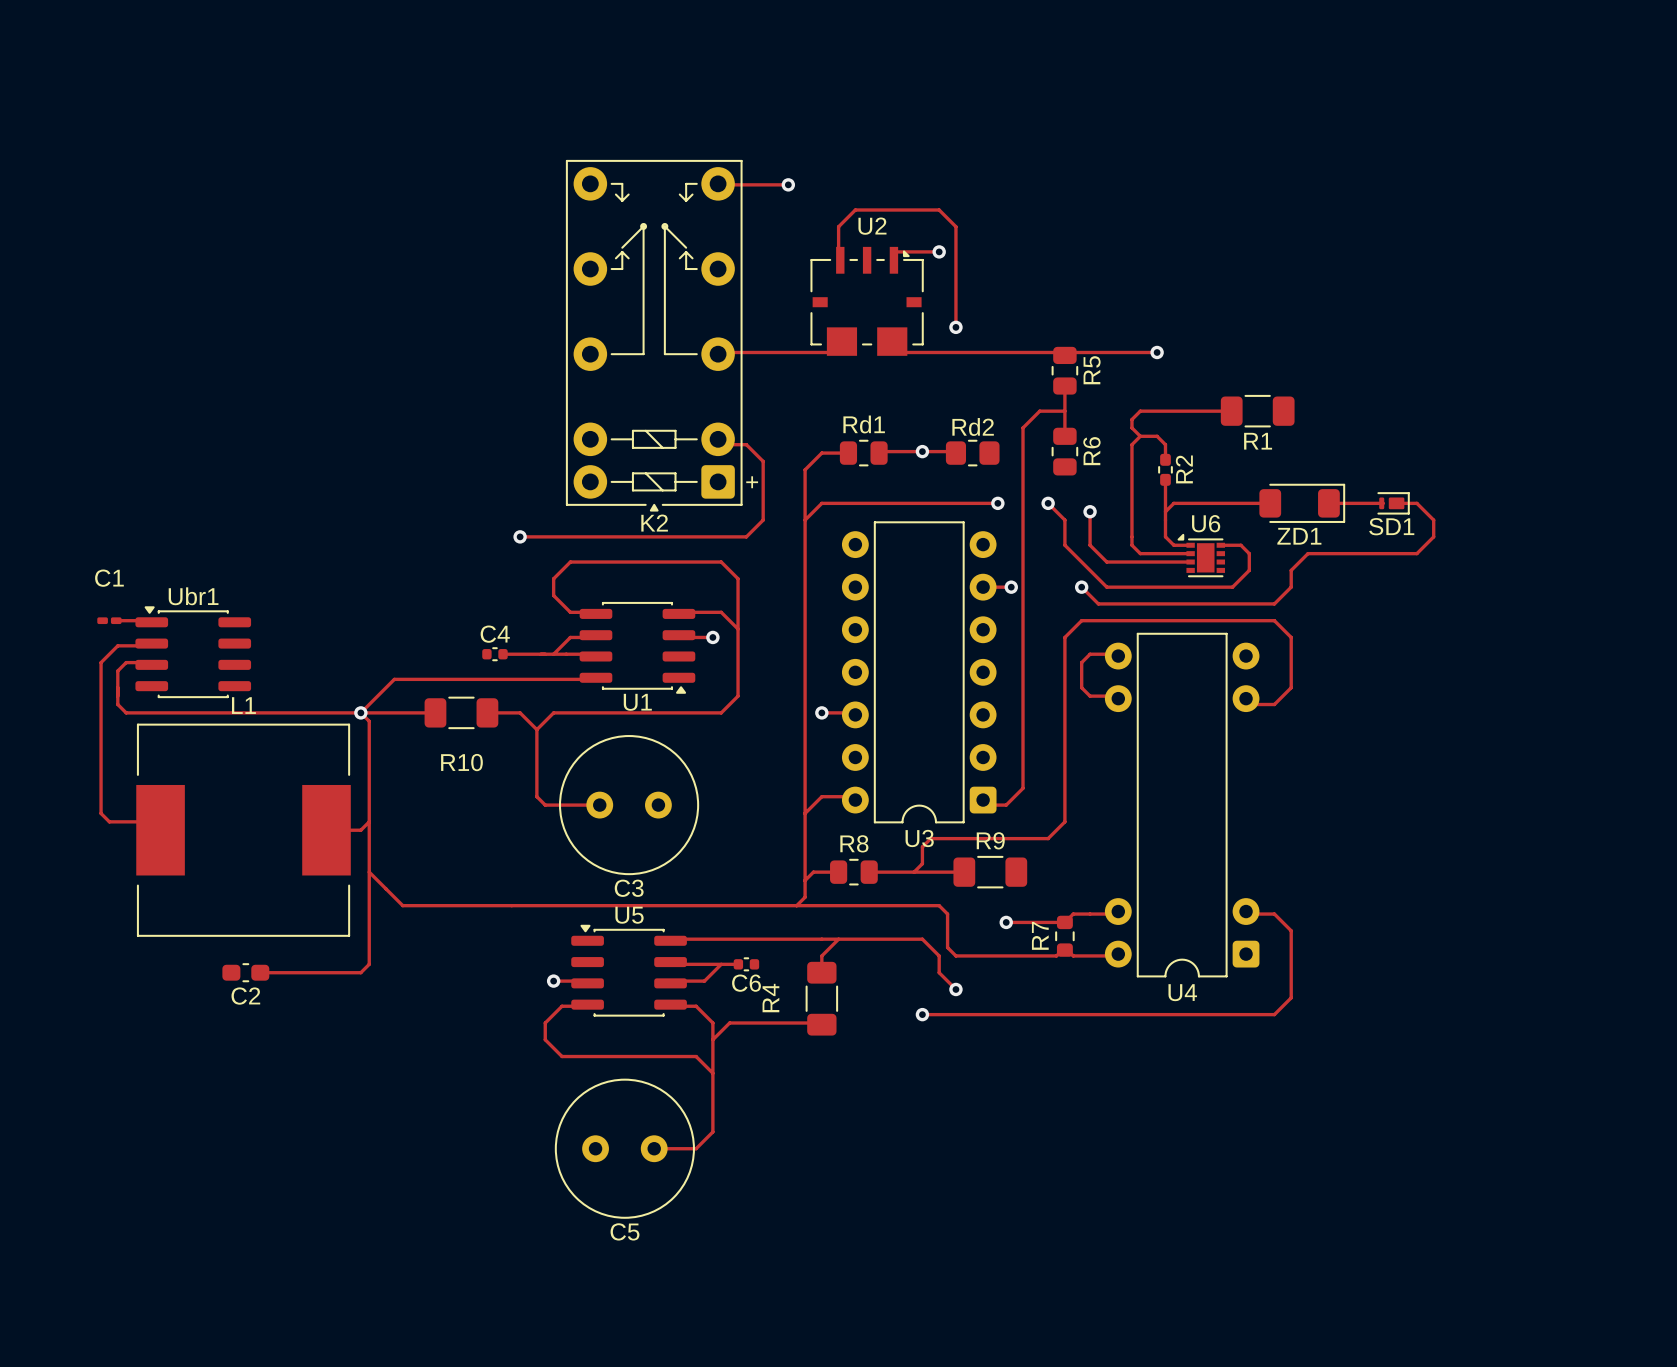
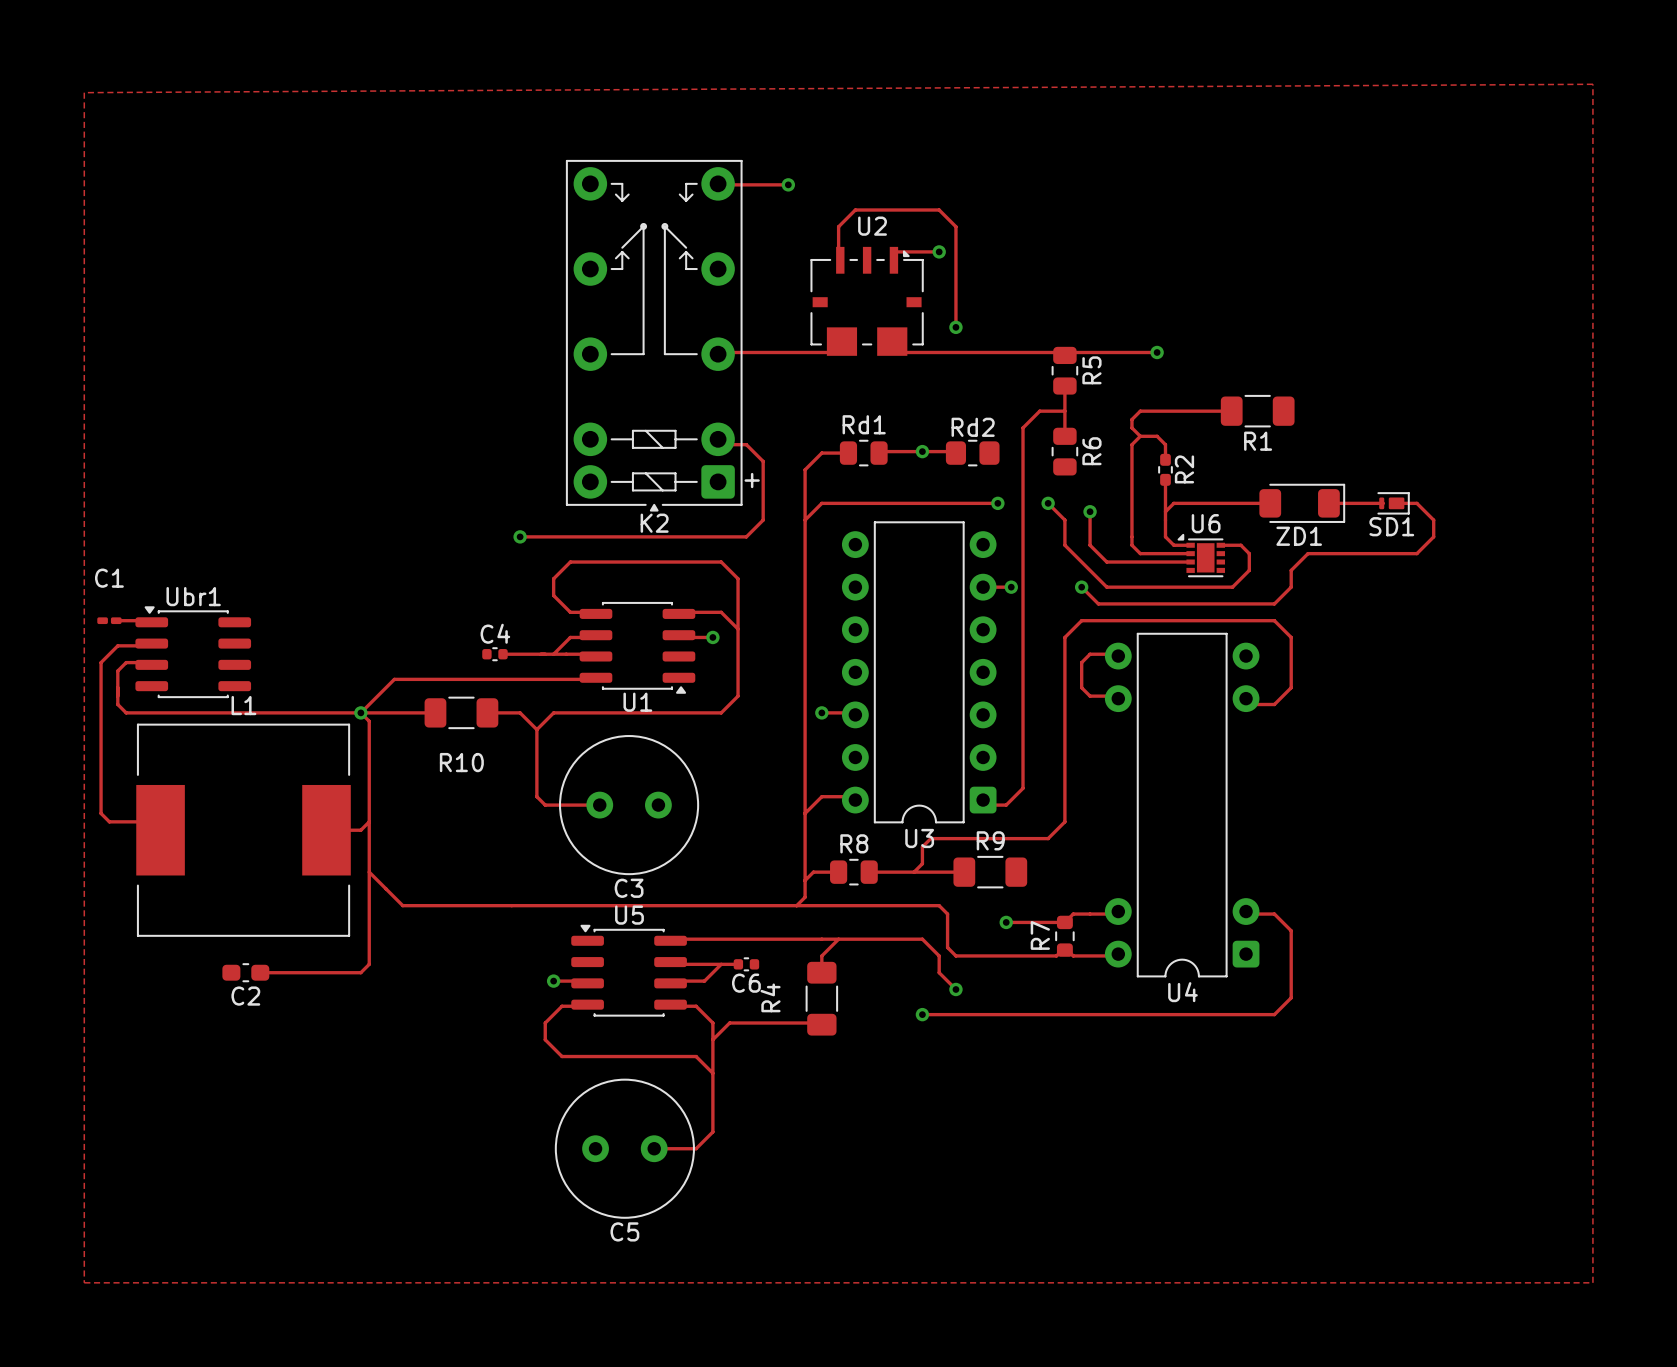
zone outline: none -> (1592, 84) (1592, 1282) (84, 1282) (84, 92) (1592, 84)

